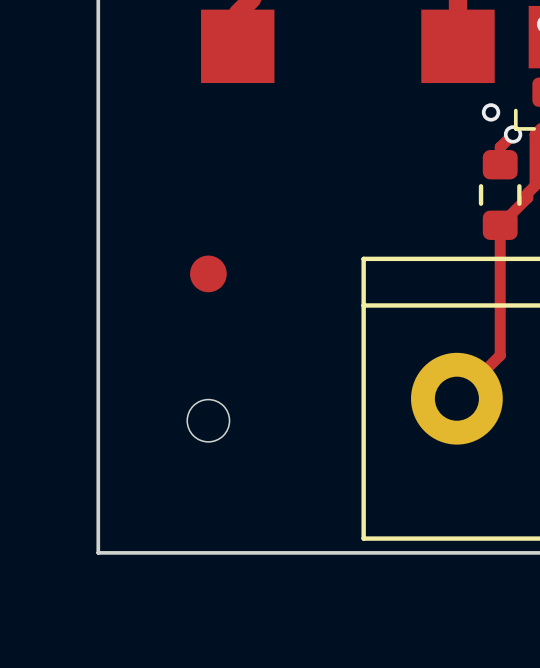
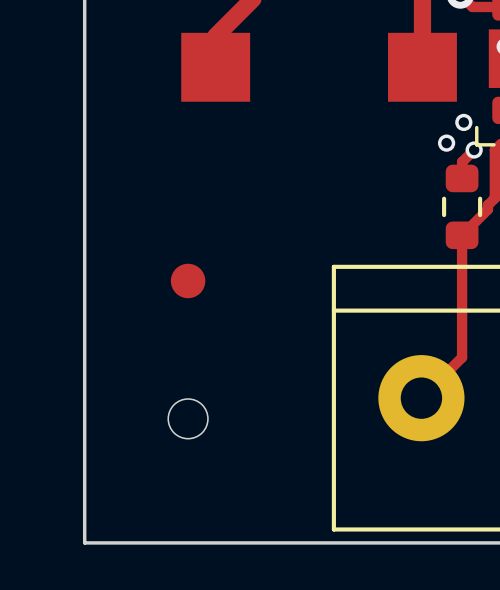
via: none -> (463, 122)
via: (491, 112) -> none
via: none -> (446, 143)

